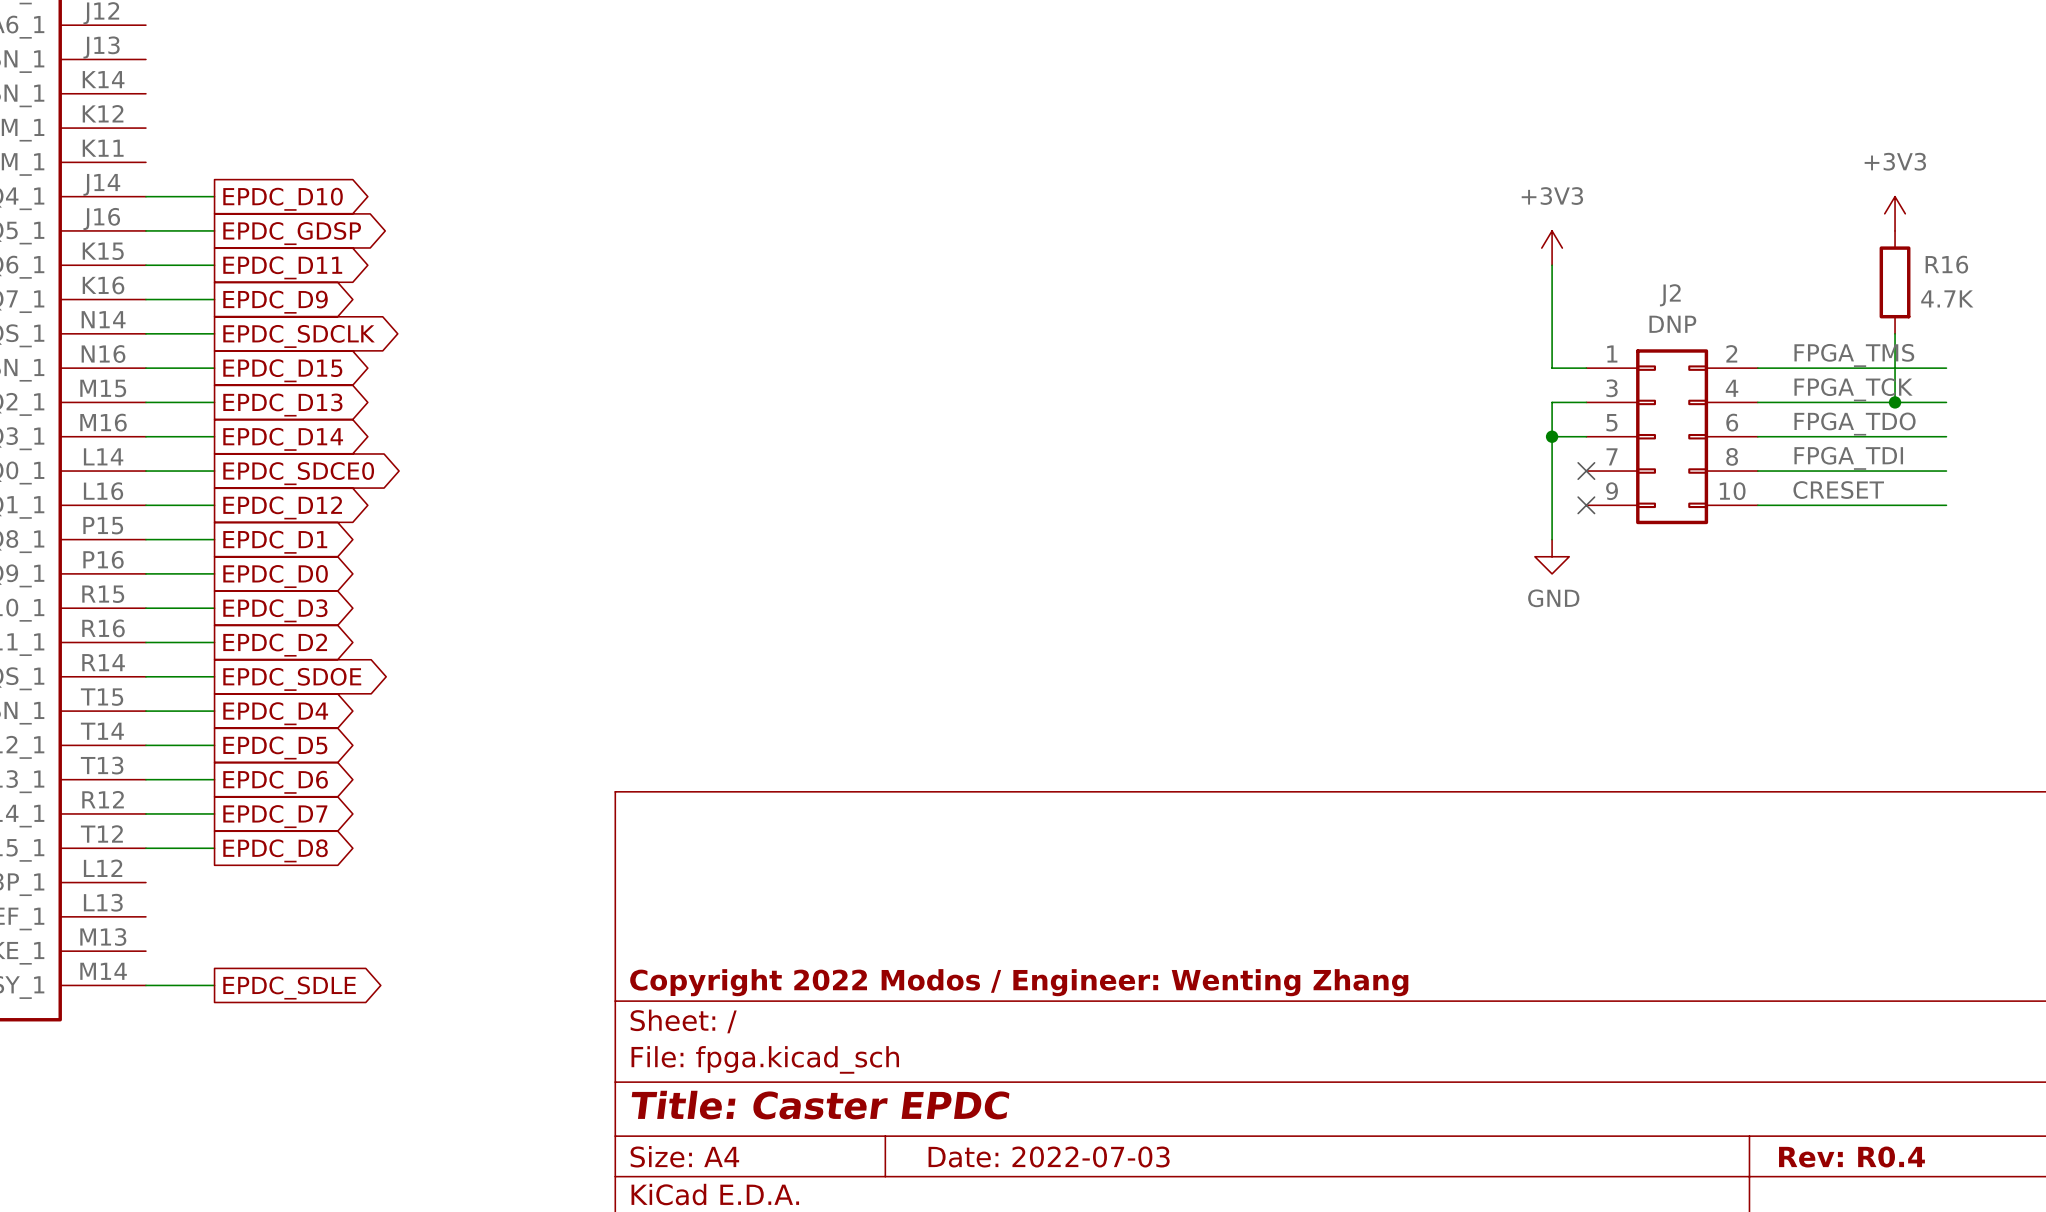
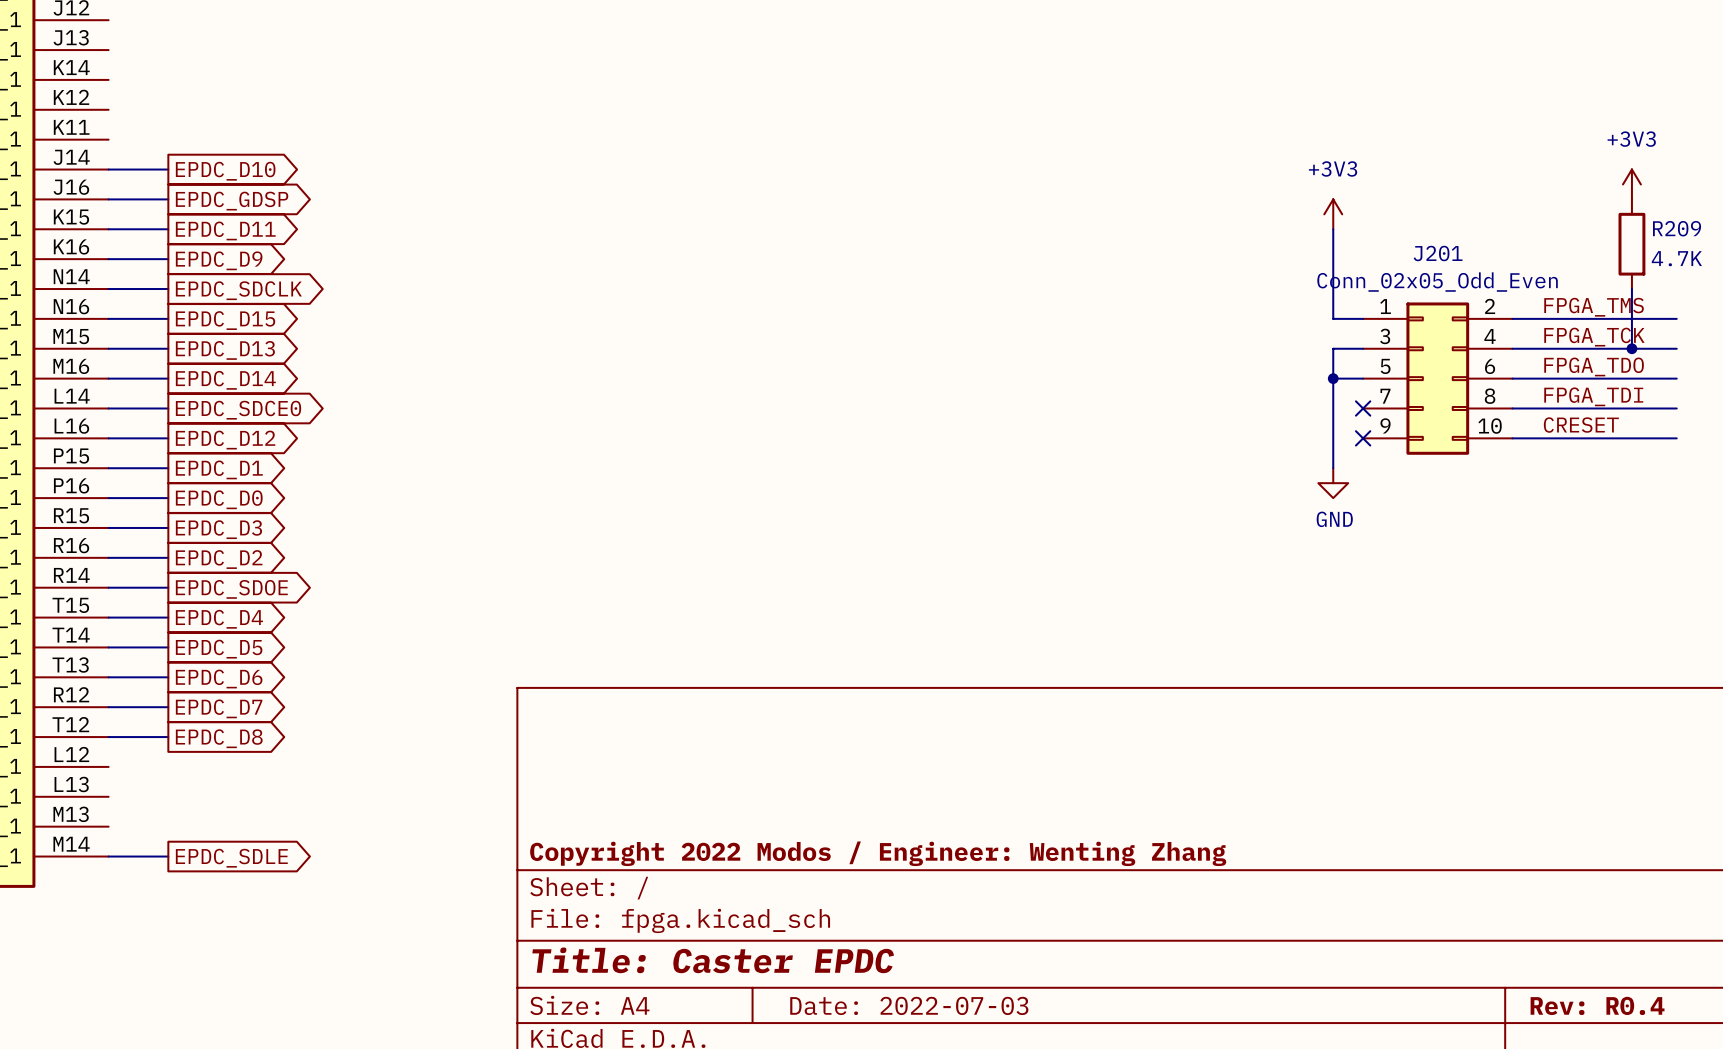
R16 name: R16 (1946, 264) -> R209 (1677, 228)
J2 name: J2 (1670, 295) -> J201 (1438, 253)
J2 value: DNP (1672, 324) -> Conn_02x05_Odd_Even (1437, 282)

